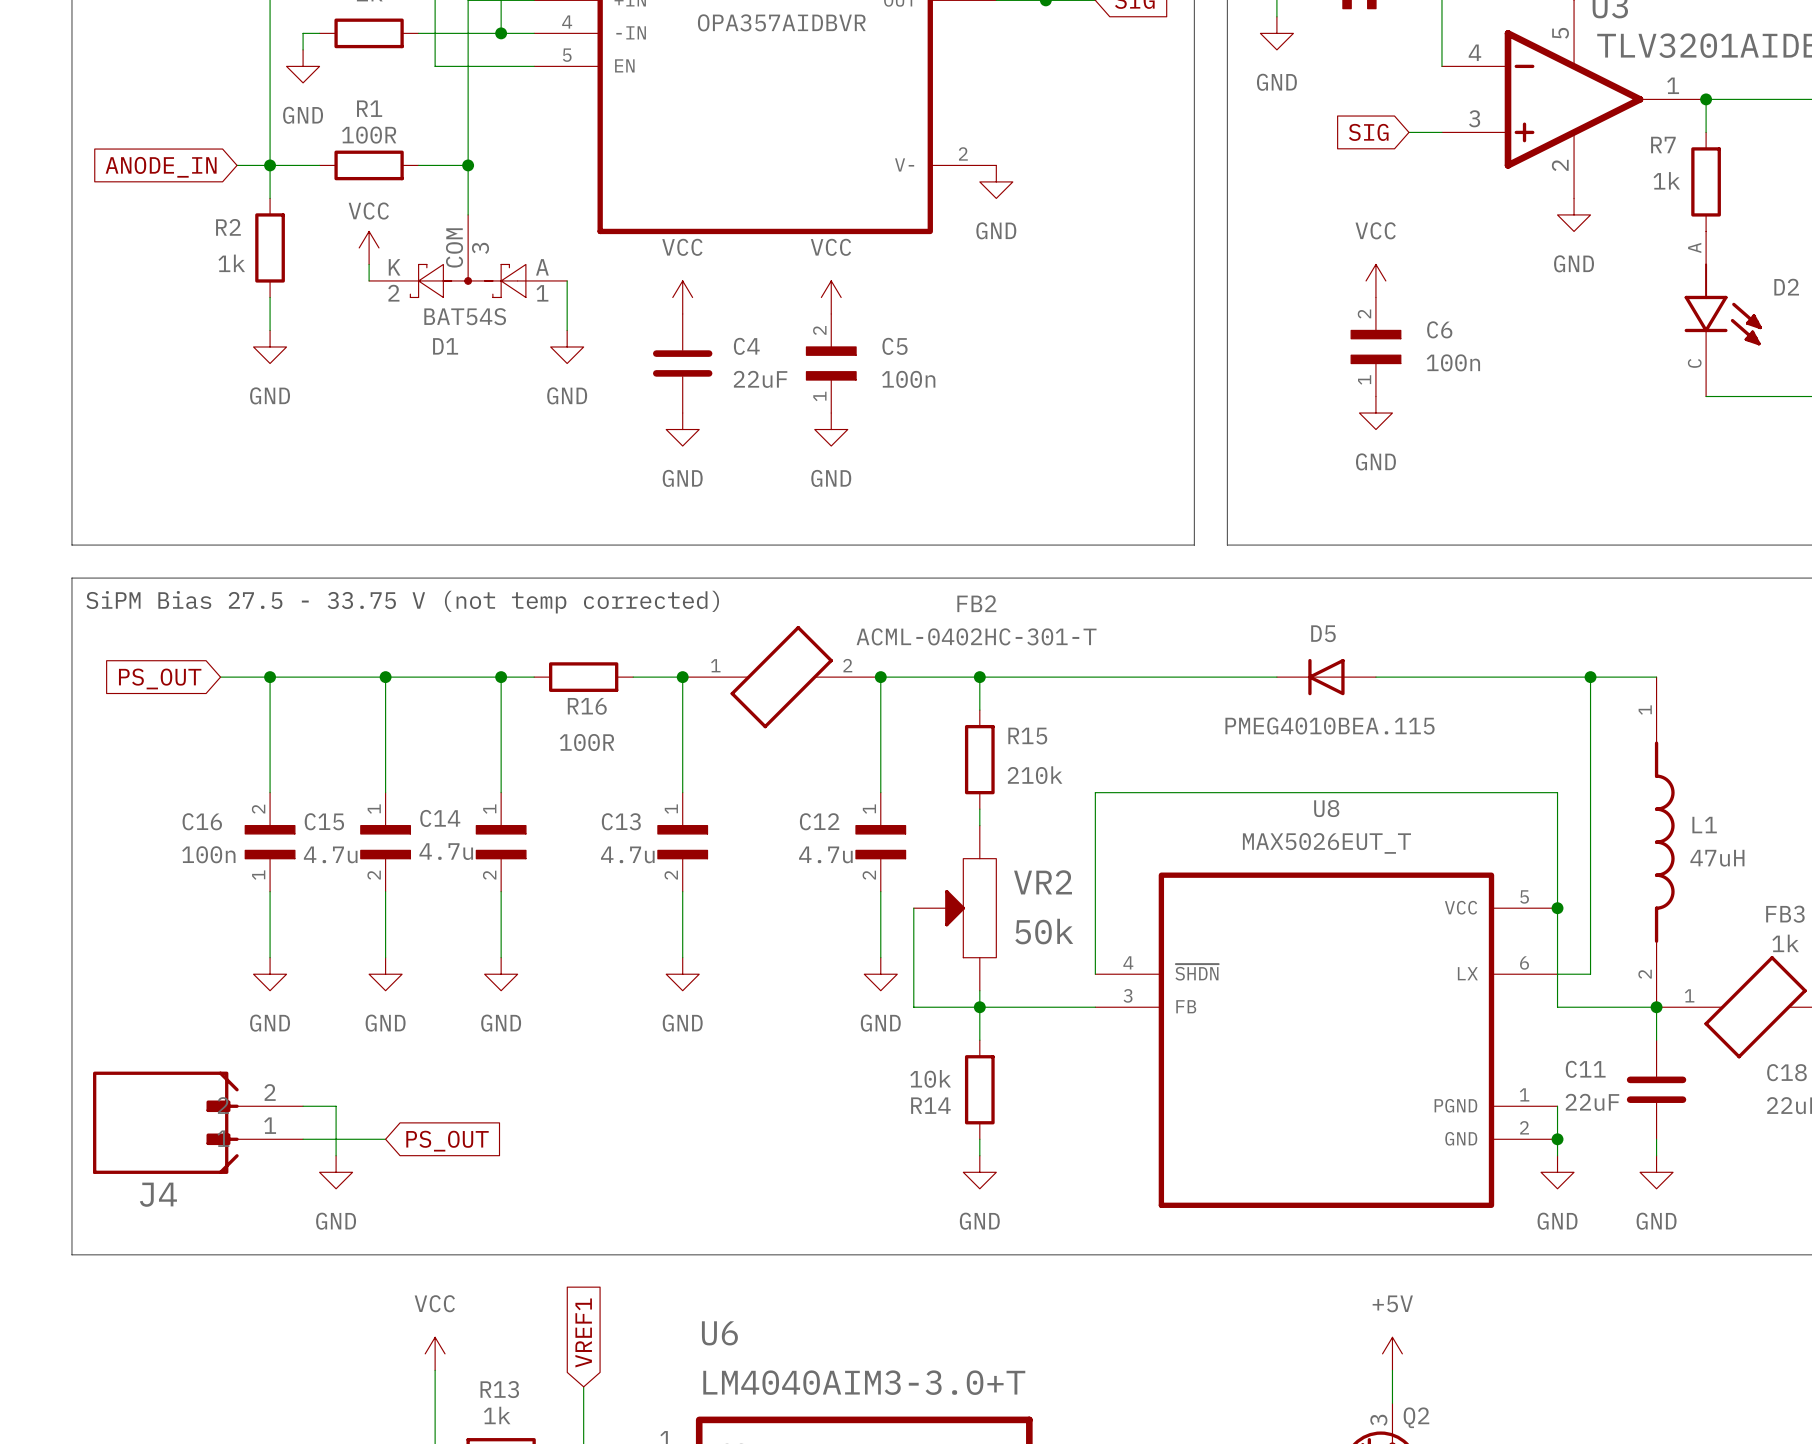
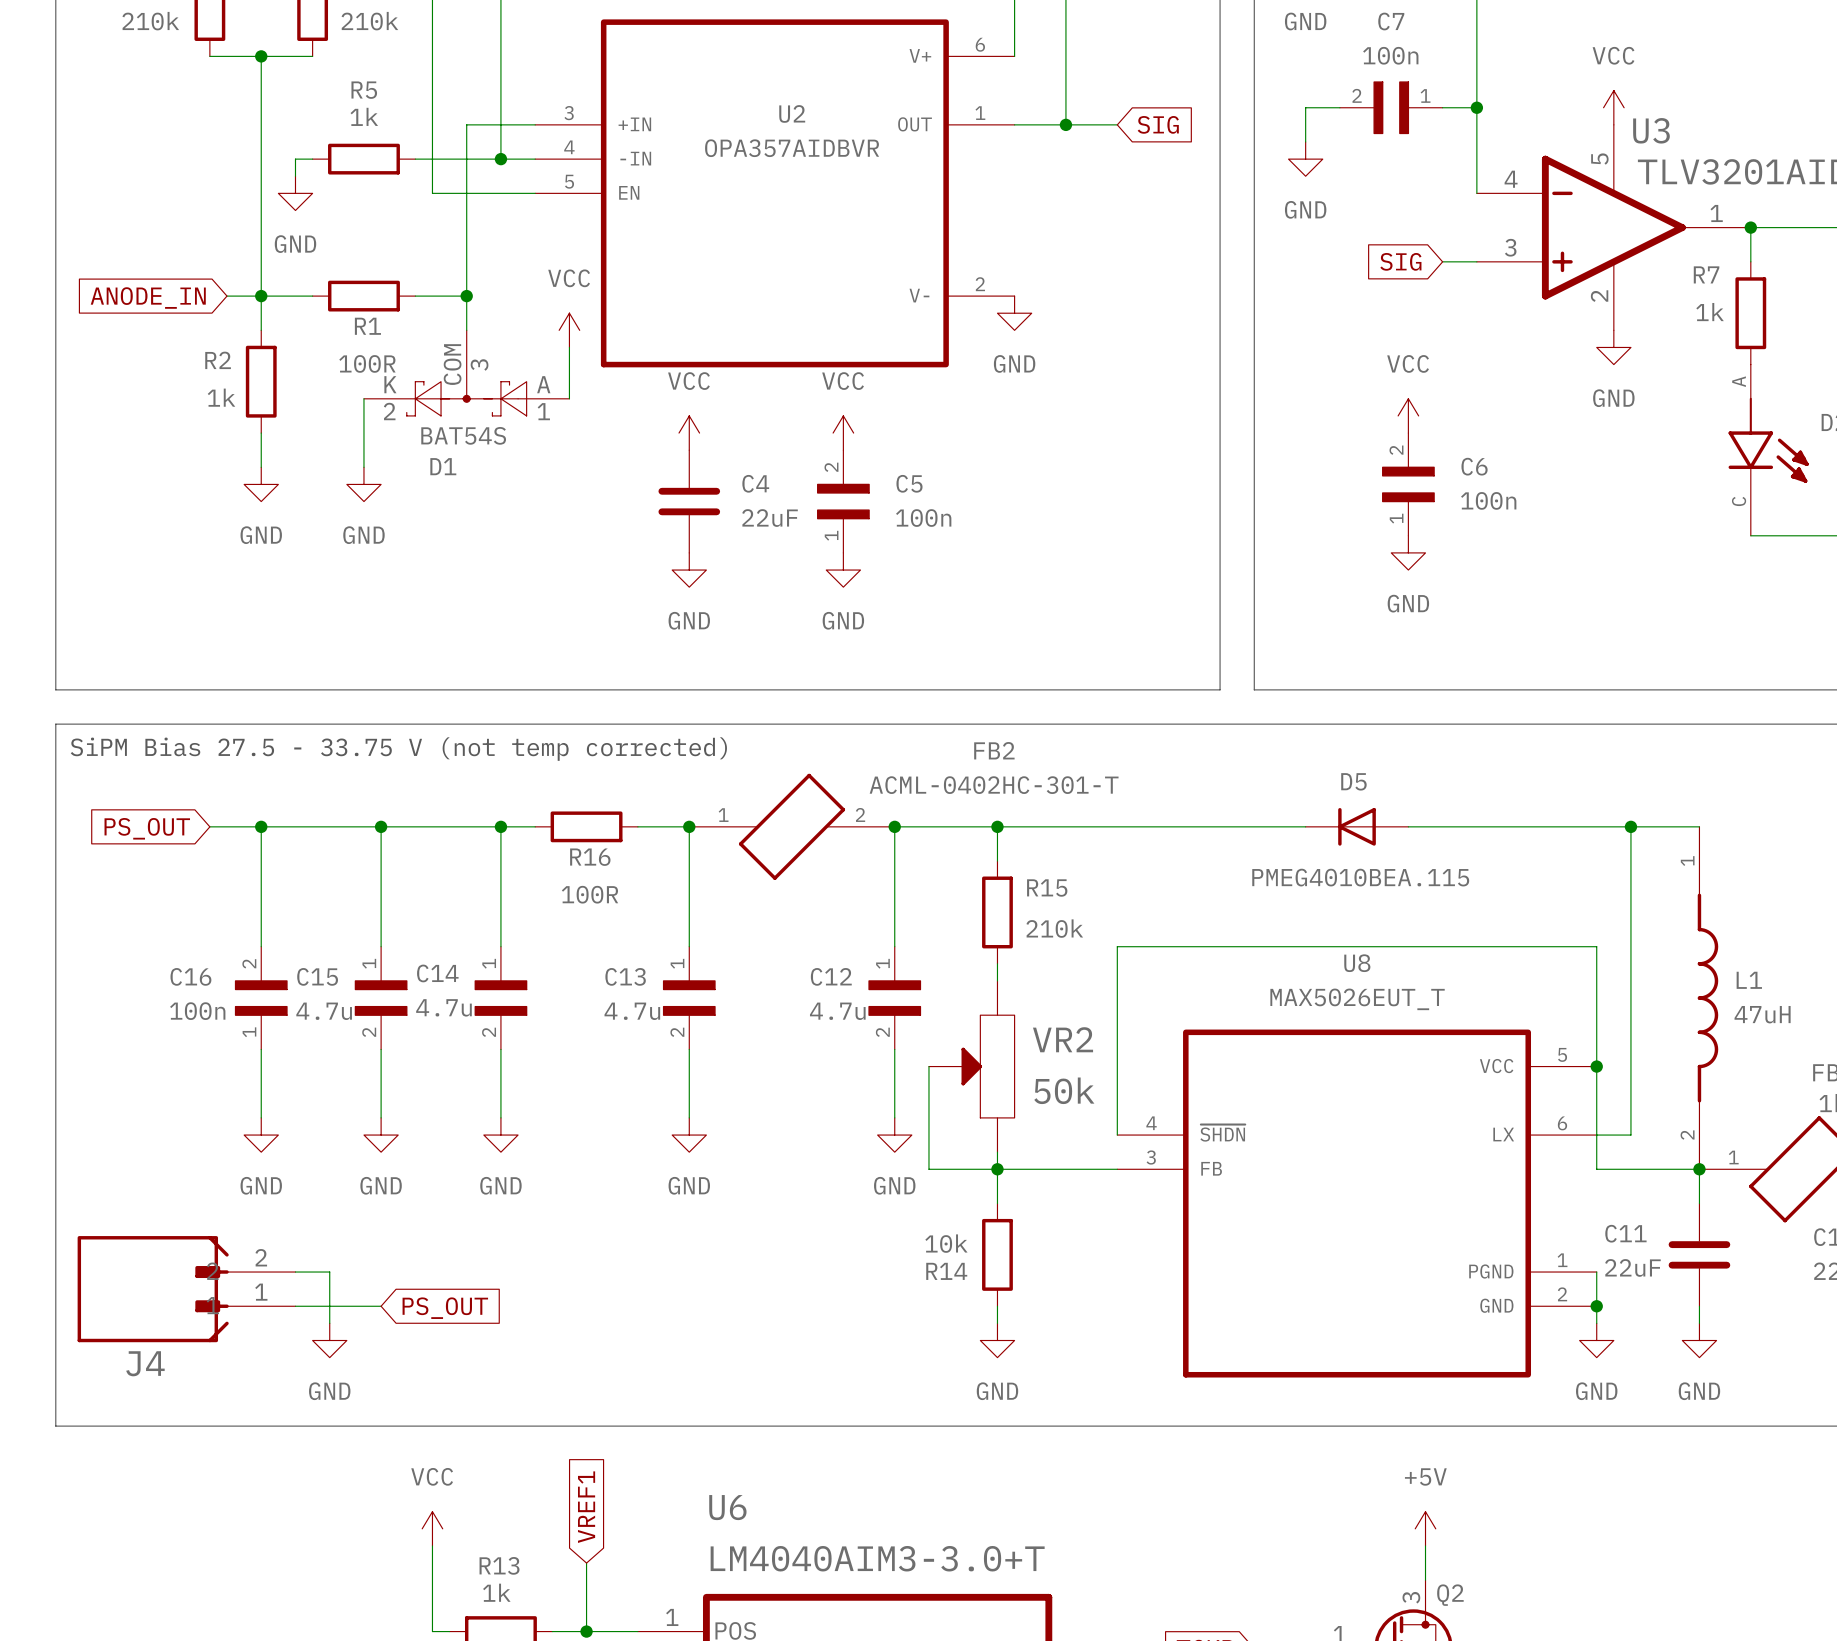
R1 name position: R1 (369, 108) -> R1 (367, 326)
R1 value position: 100R (369, 135) -> 100R (367, 363)
power symbol text position: VCC (368, 211) -> VCC (569, 278)
power symbol position: VCC (369, 247) -> VCC (569, 330)
D1 position: (468, 256) -> (466, 373)
wire: none -> (363, 415) (363, 467)
wire: (567, 280) (567, 330) -> (569, 347) (569, 398)
power symbol position: GND (567, 346) -> GND (363, 484)

